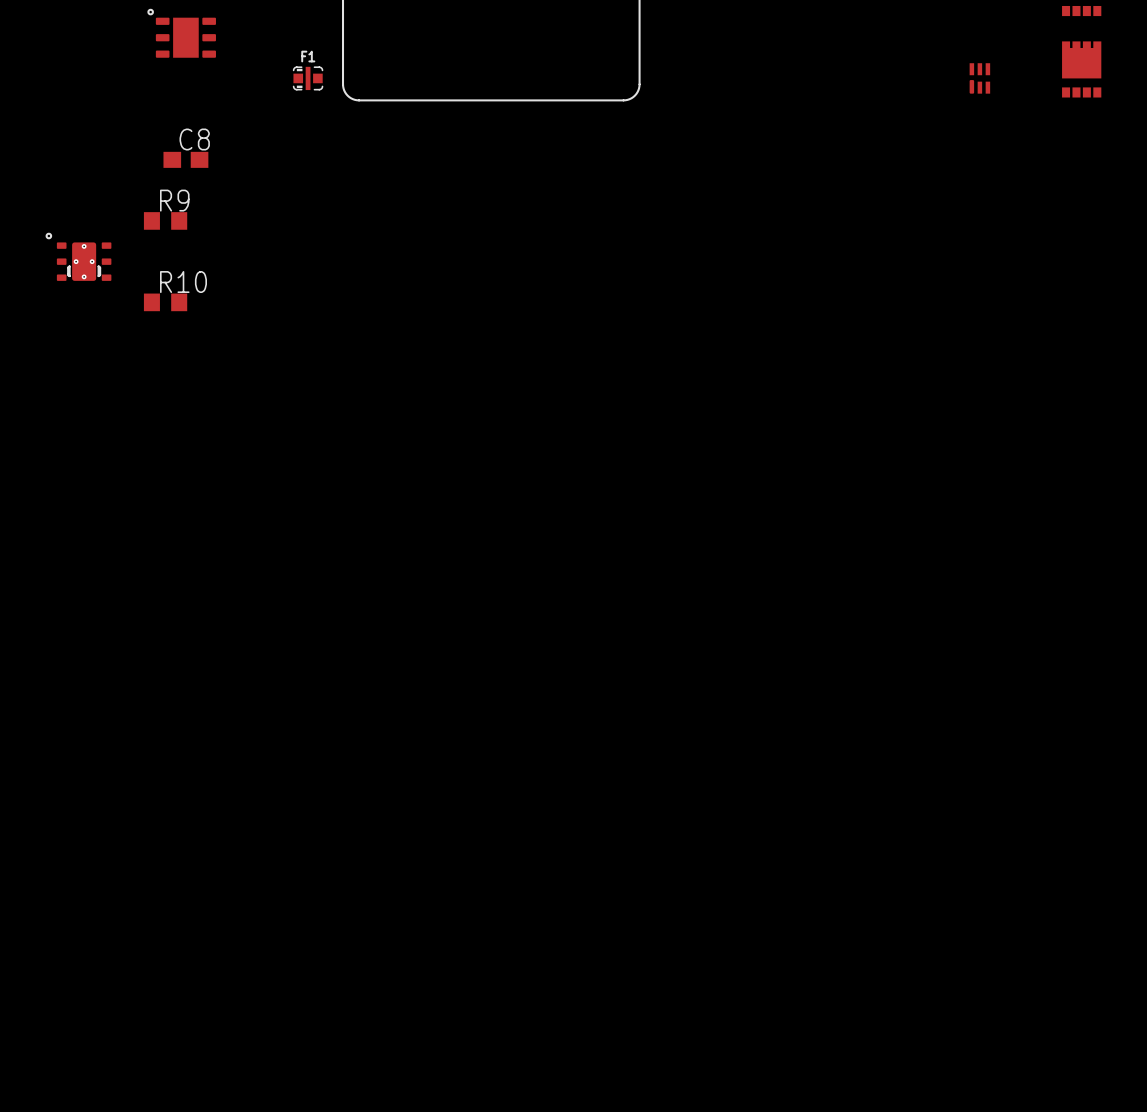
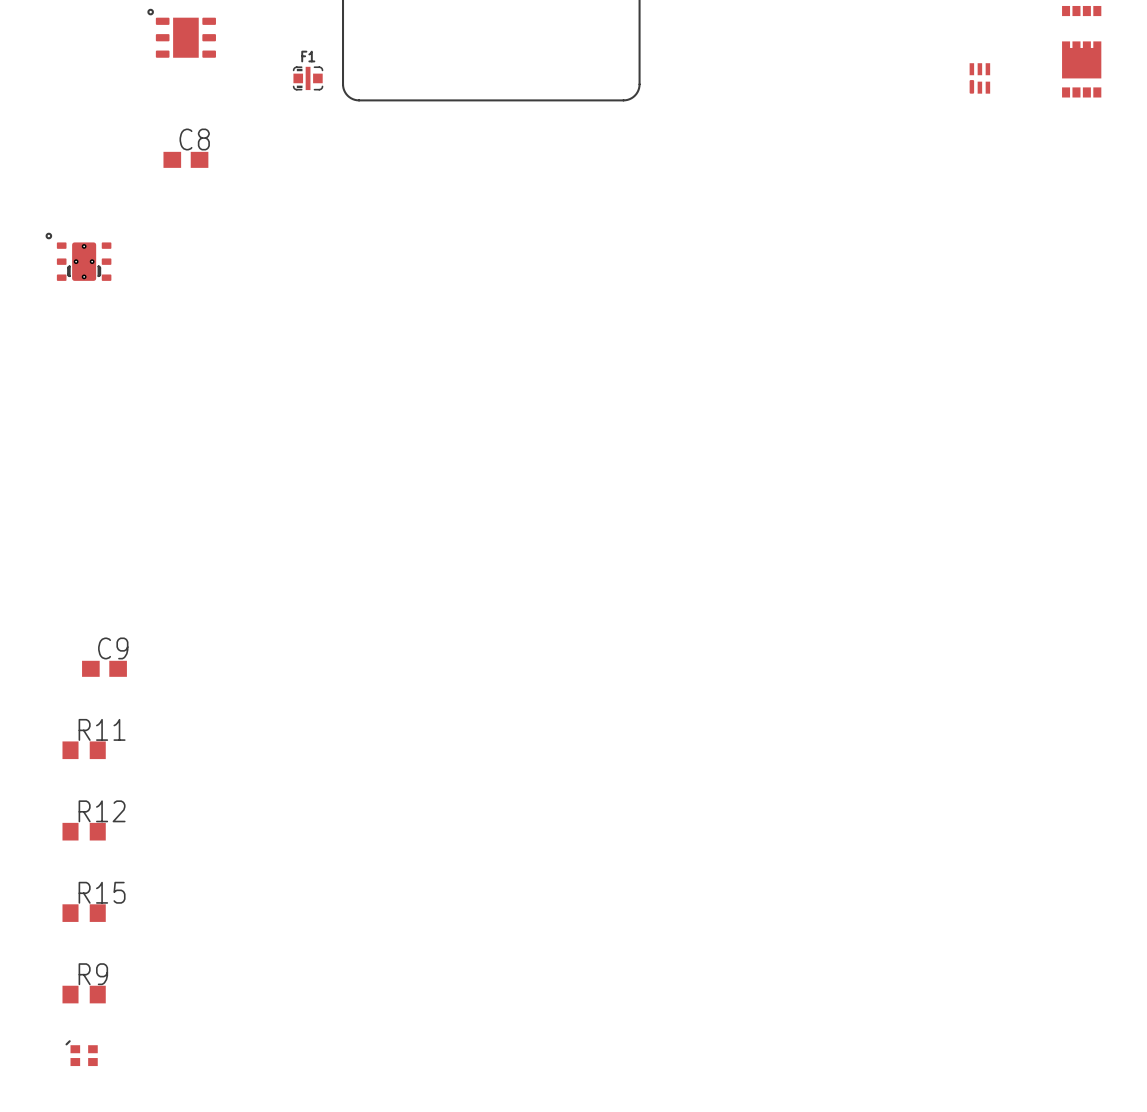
R9 position: (165, 220) -> (84, 994)
R10: (165, 302) -> none
C9: none -> (104, 668)
R11: none -> (84, 750)
R12: none -> (84, 831)
R15: none -> (84, 913)
part: none -> (81, 1053)

